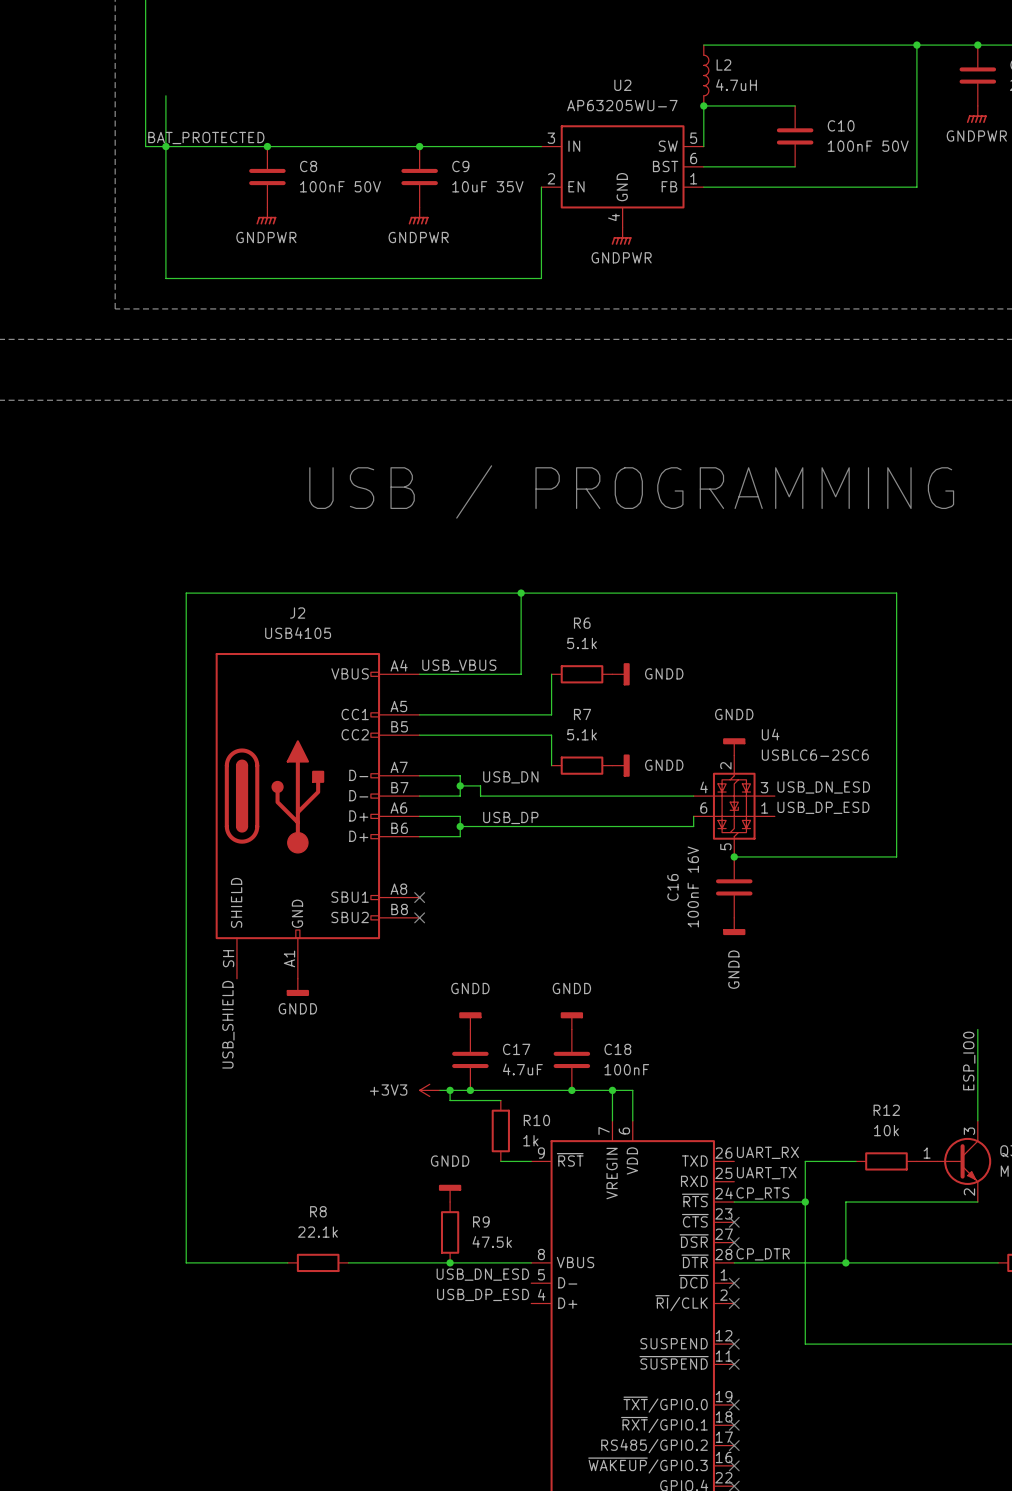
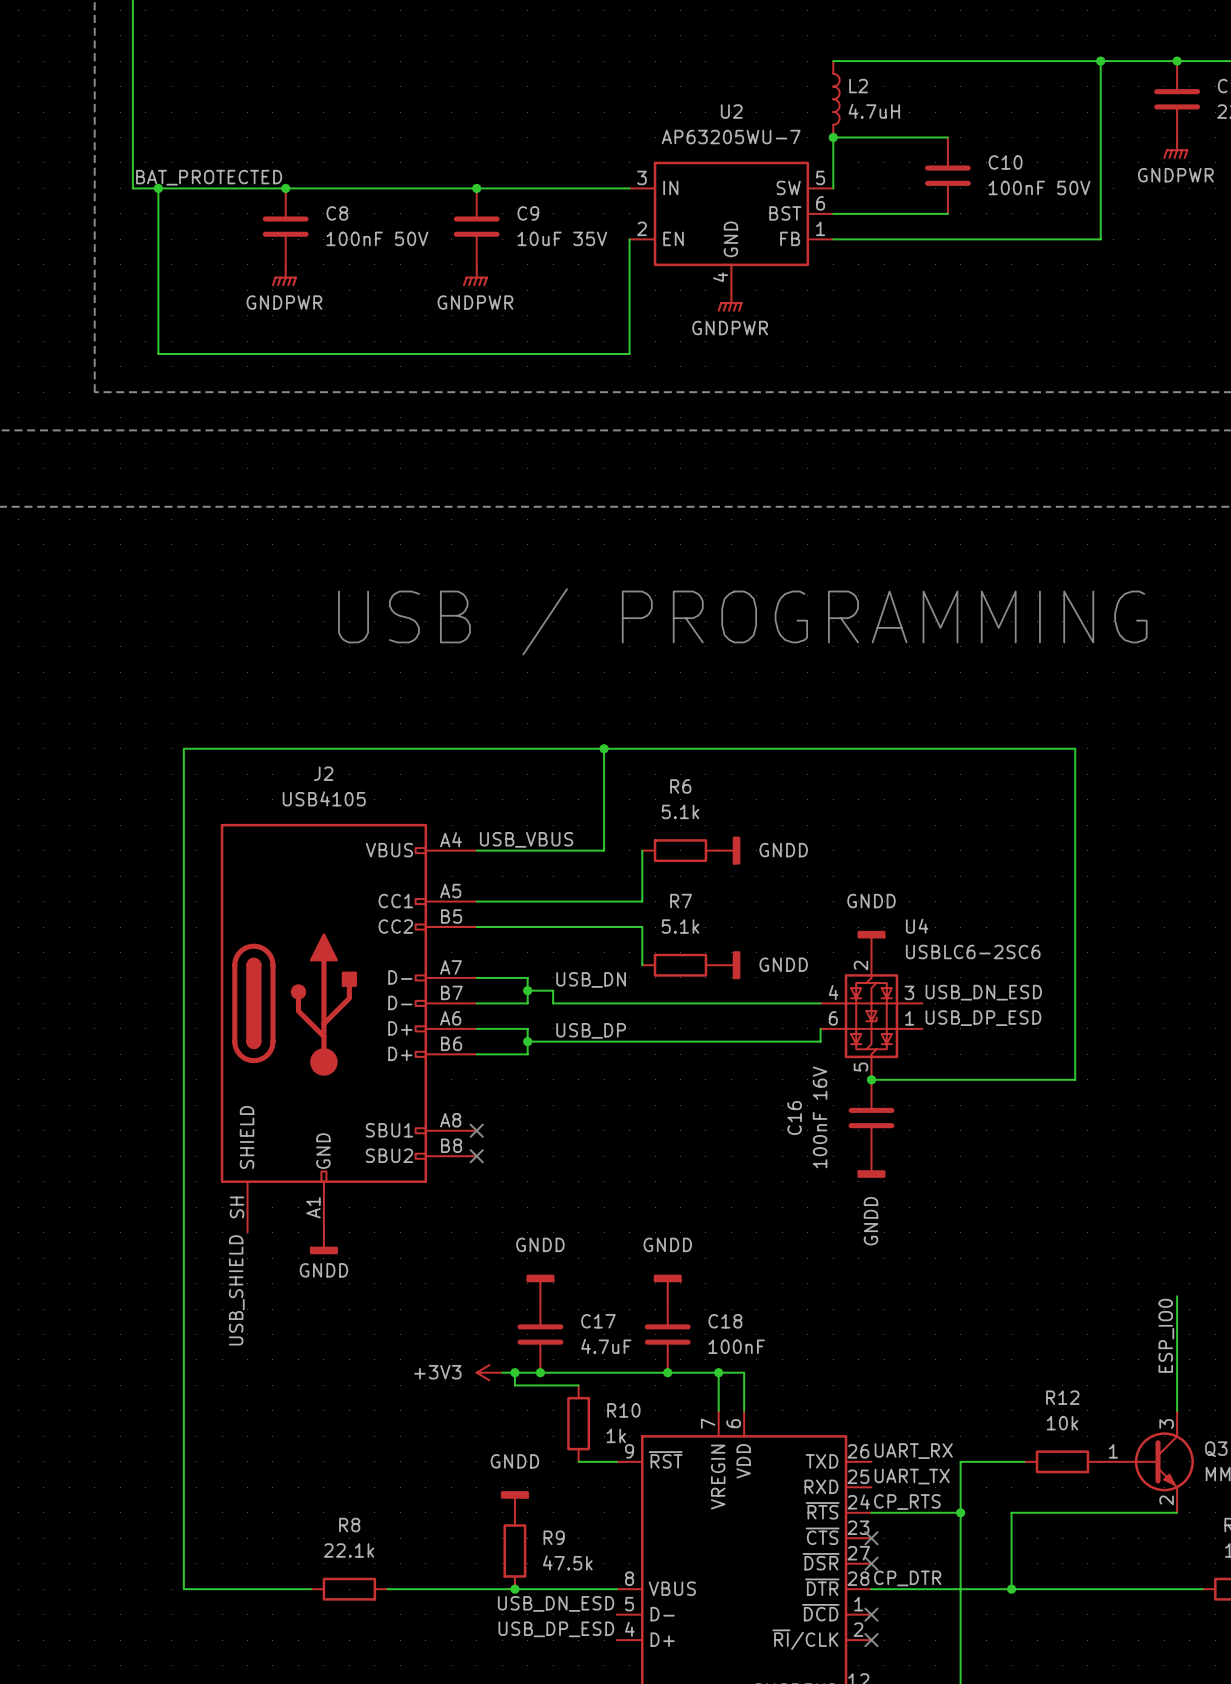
wire: (165, 95) (165, 146) -> none

